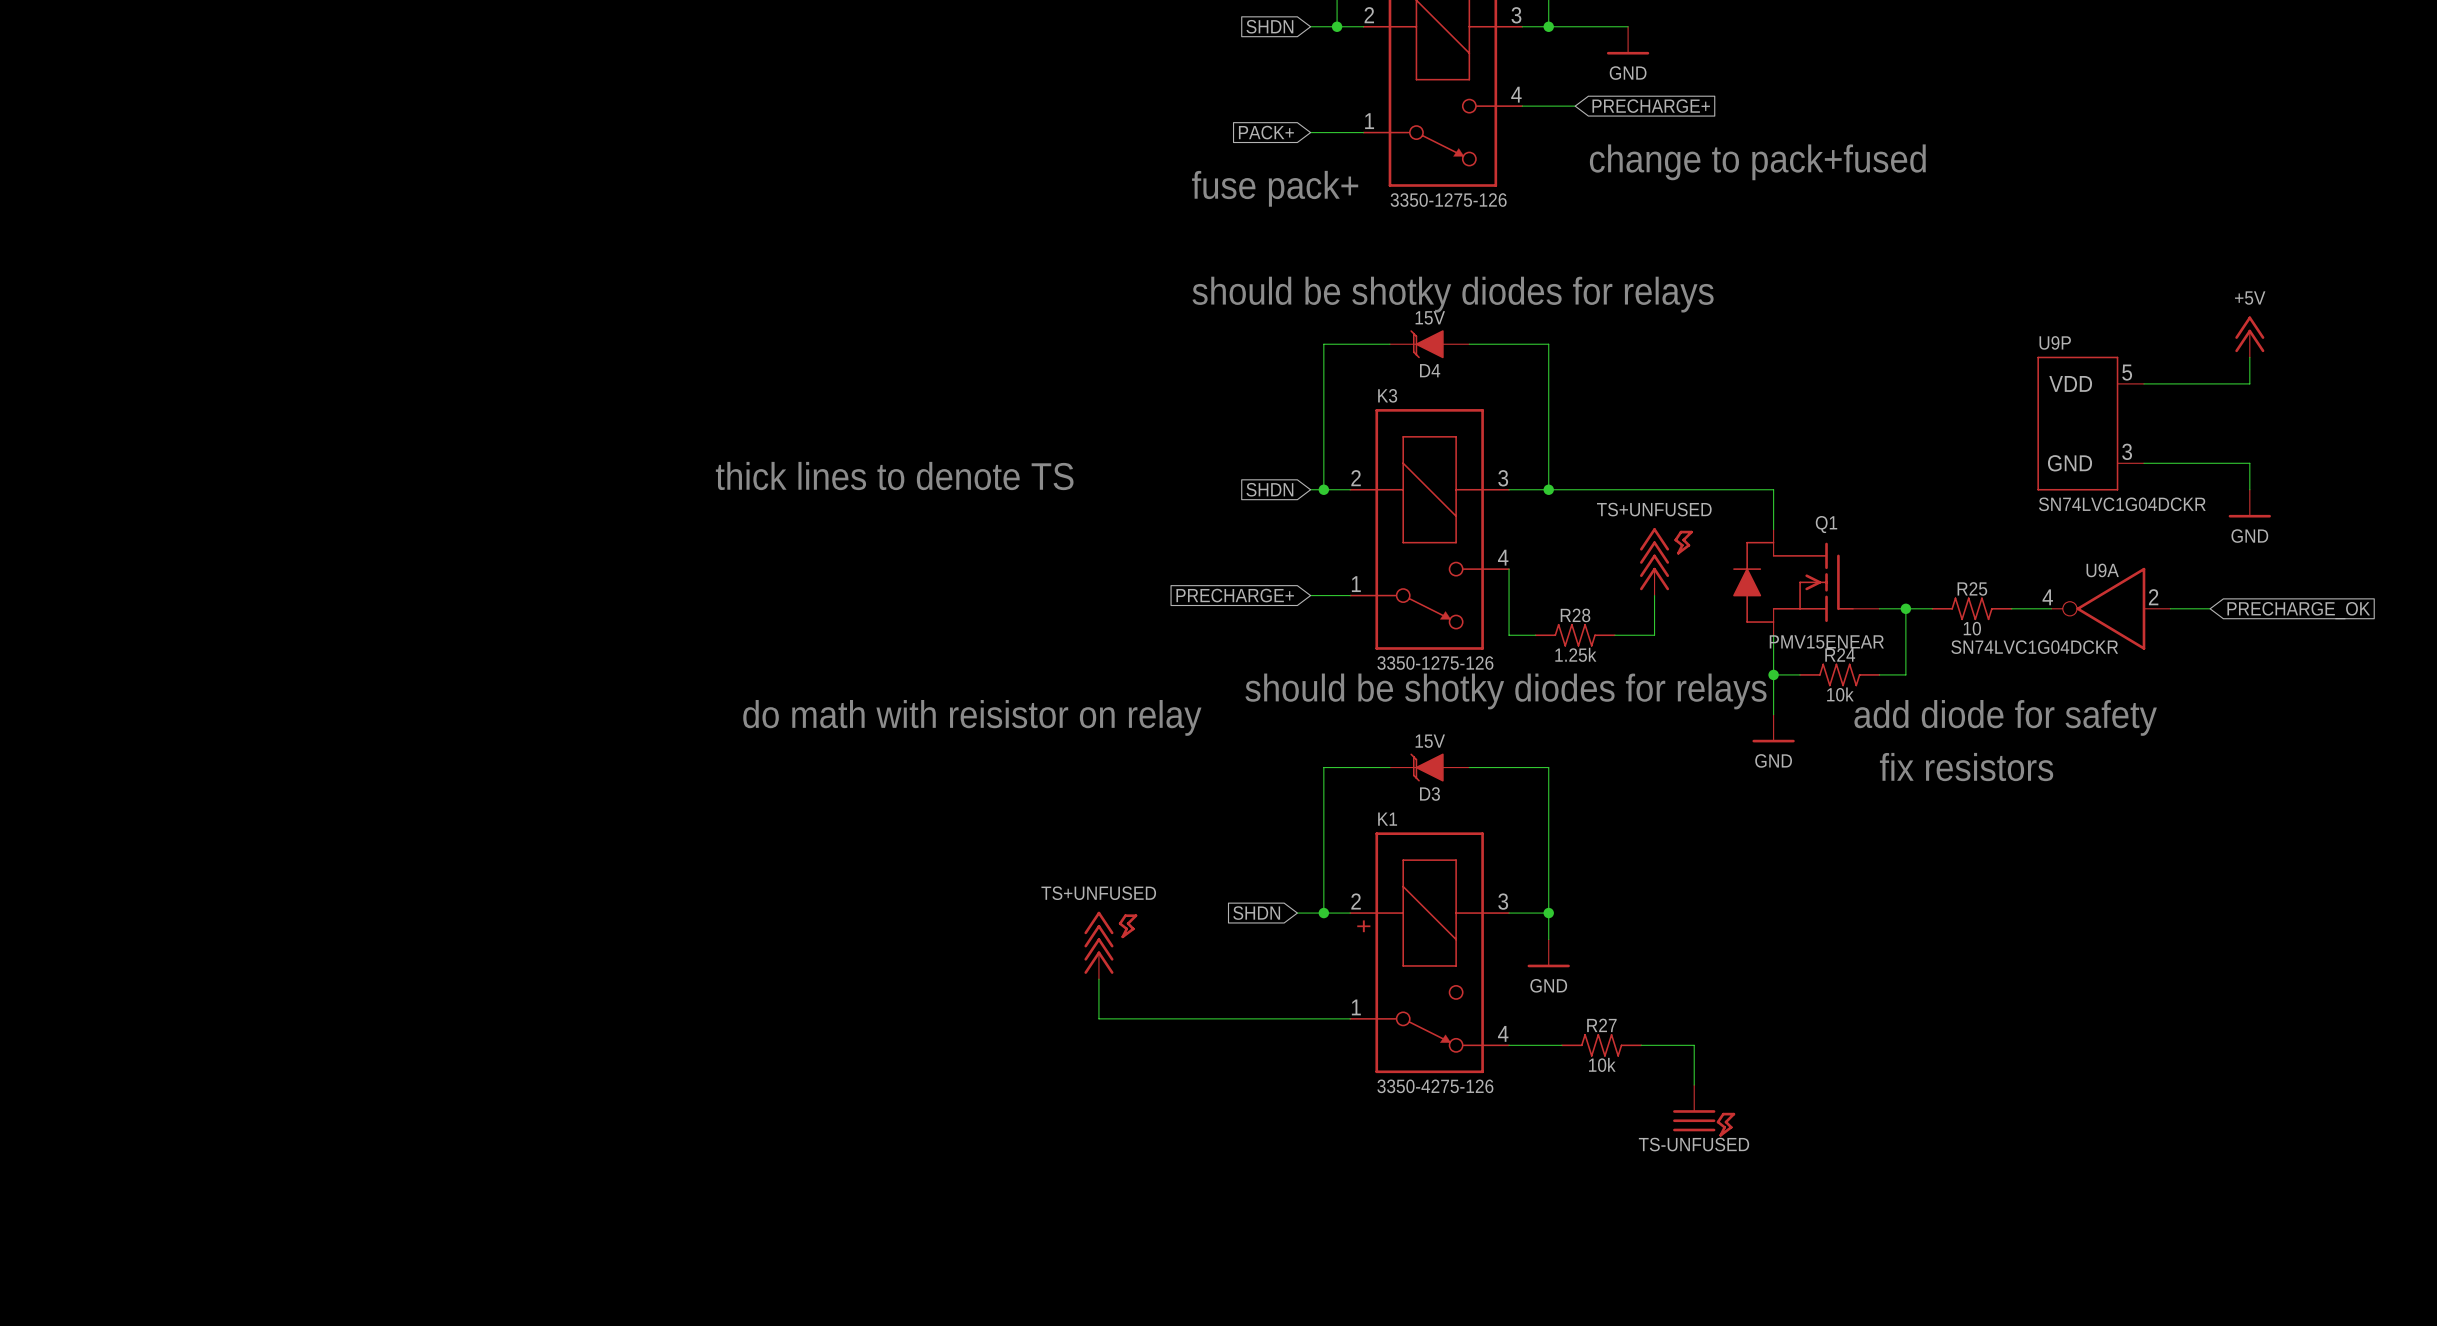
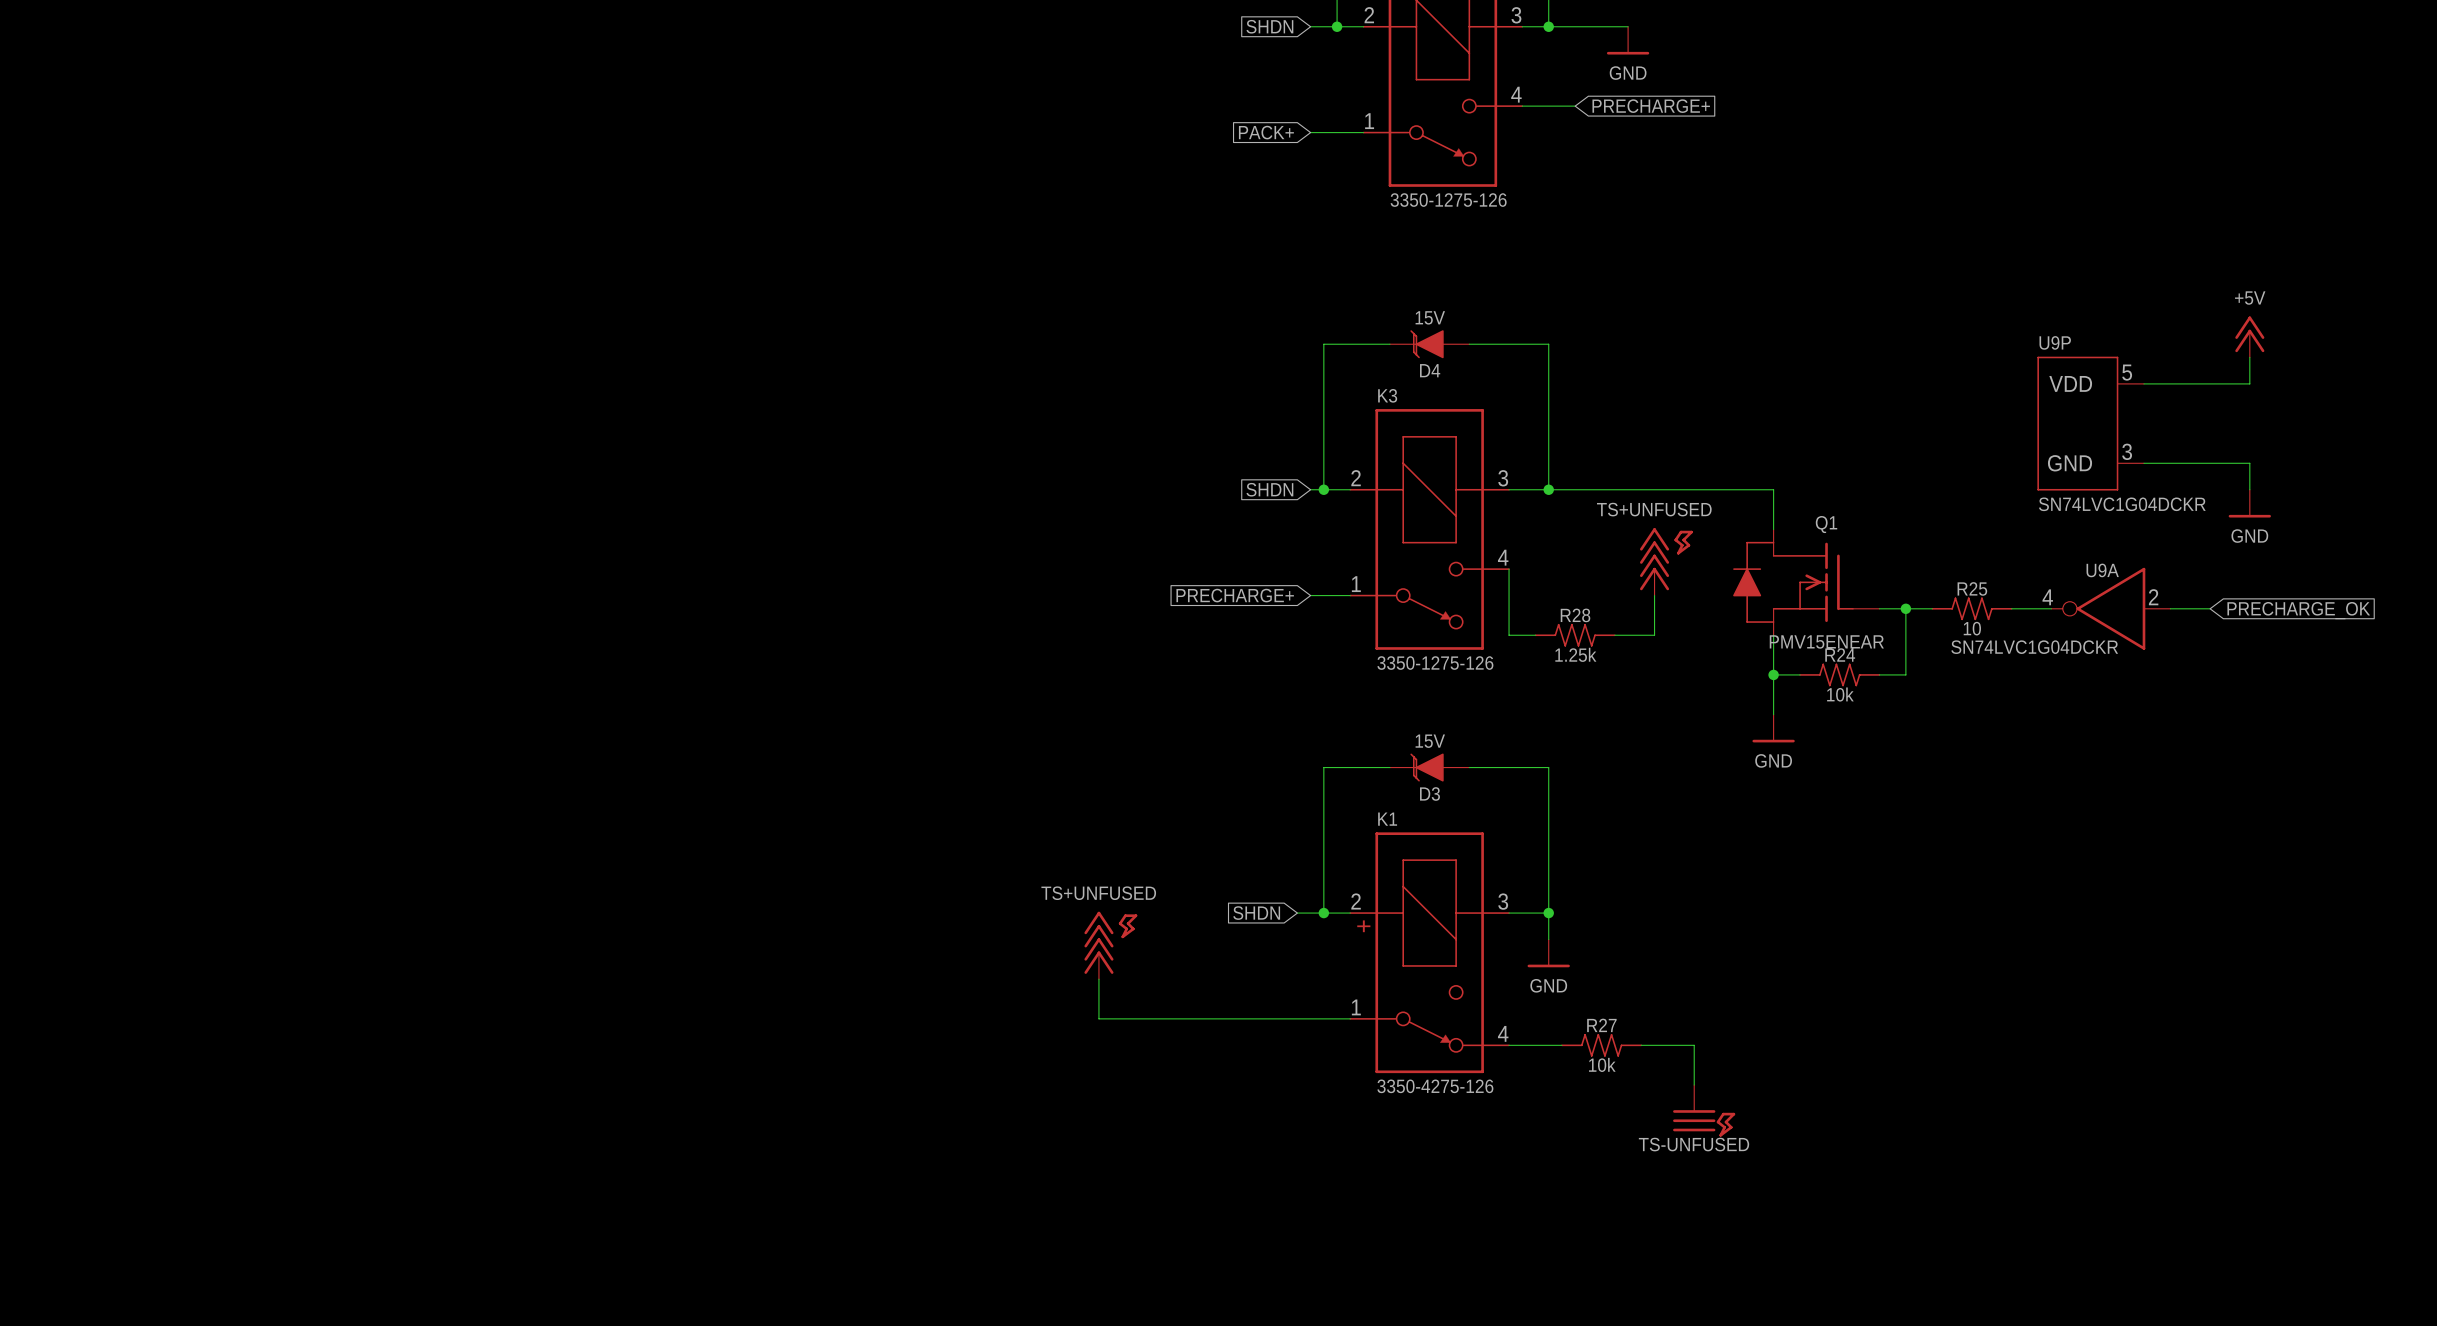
text: change to pack+fused (1757, 162) -> none
text: fuse pack+ (1275, 188) -> none
text: should be shotky diodes for relays (1453, 294) -> none
text: thick lines to denote TS (894, 476) -> none
text: should be shotky diodes for relays (1505, 691) -> none
text: do math with reisistor on relay (972, 717) -> none
text: add diode for safety (2005, 717) -> none
text: fix resistors (1966, 767) -> none

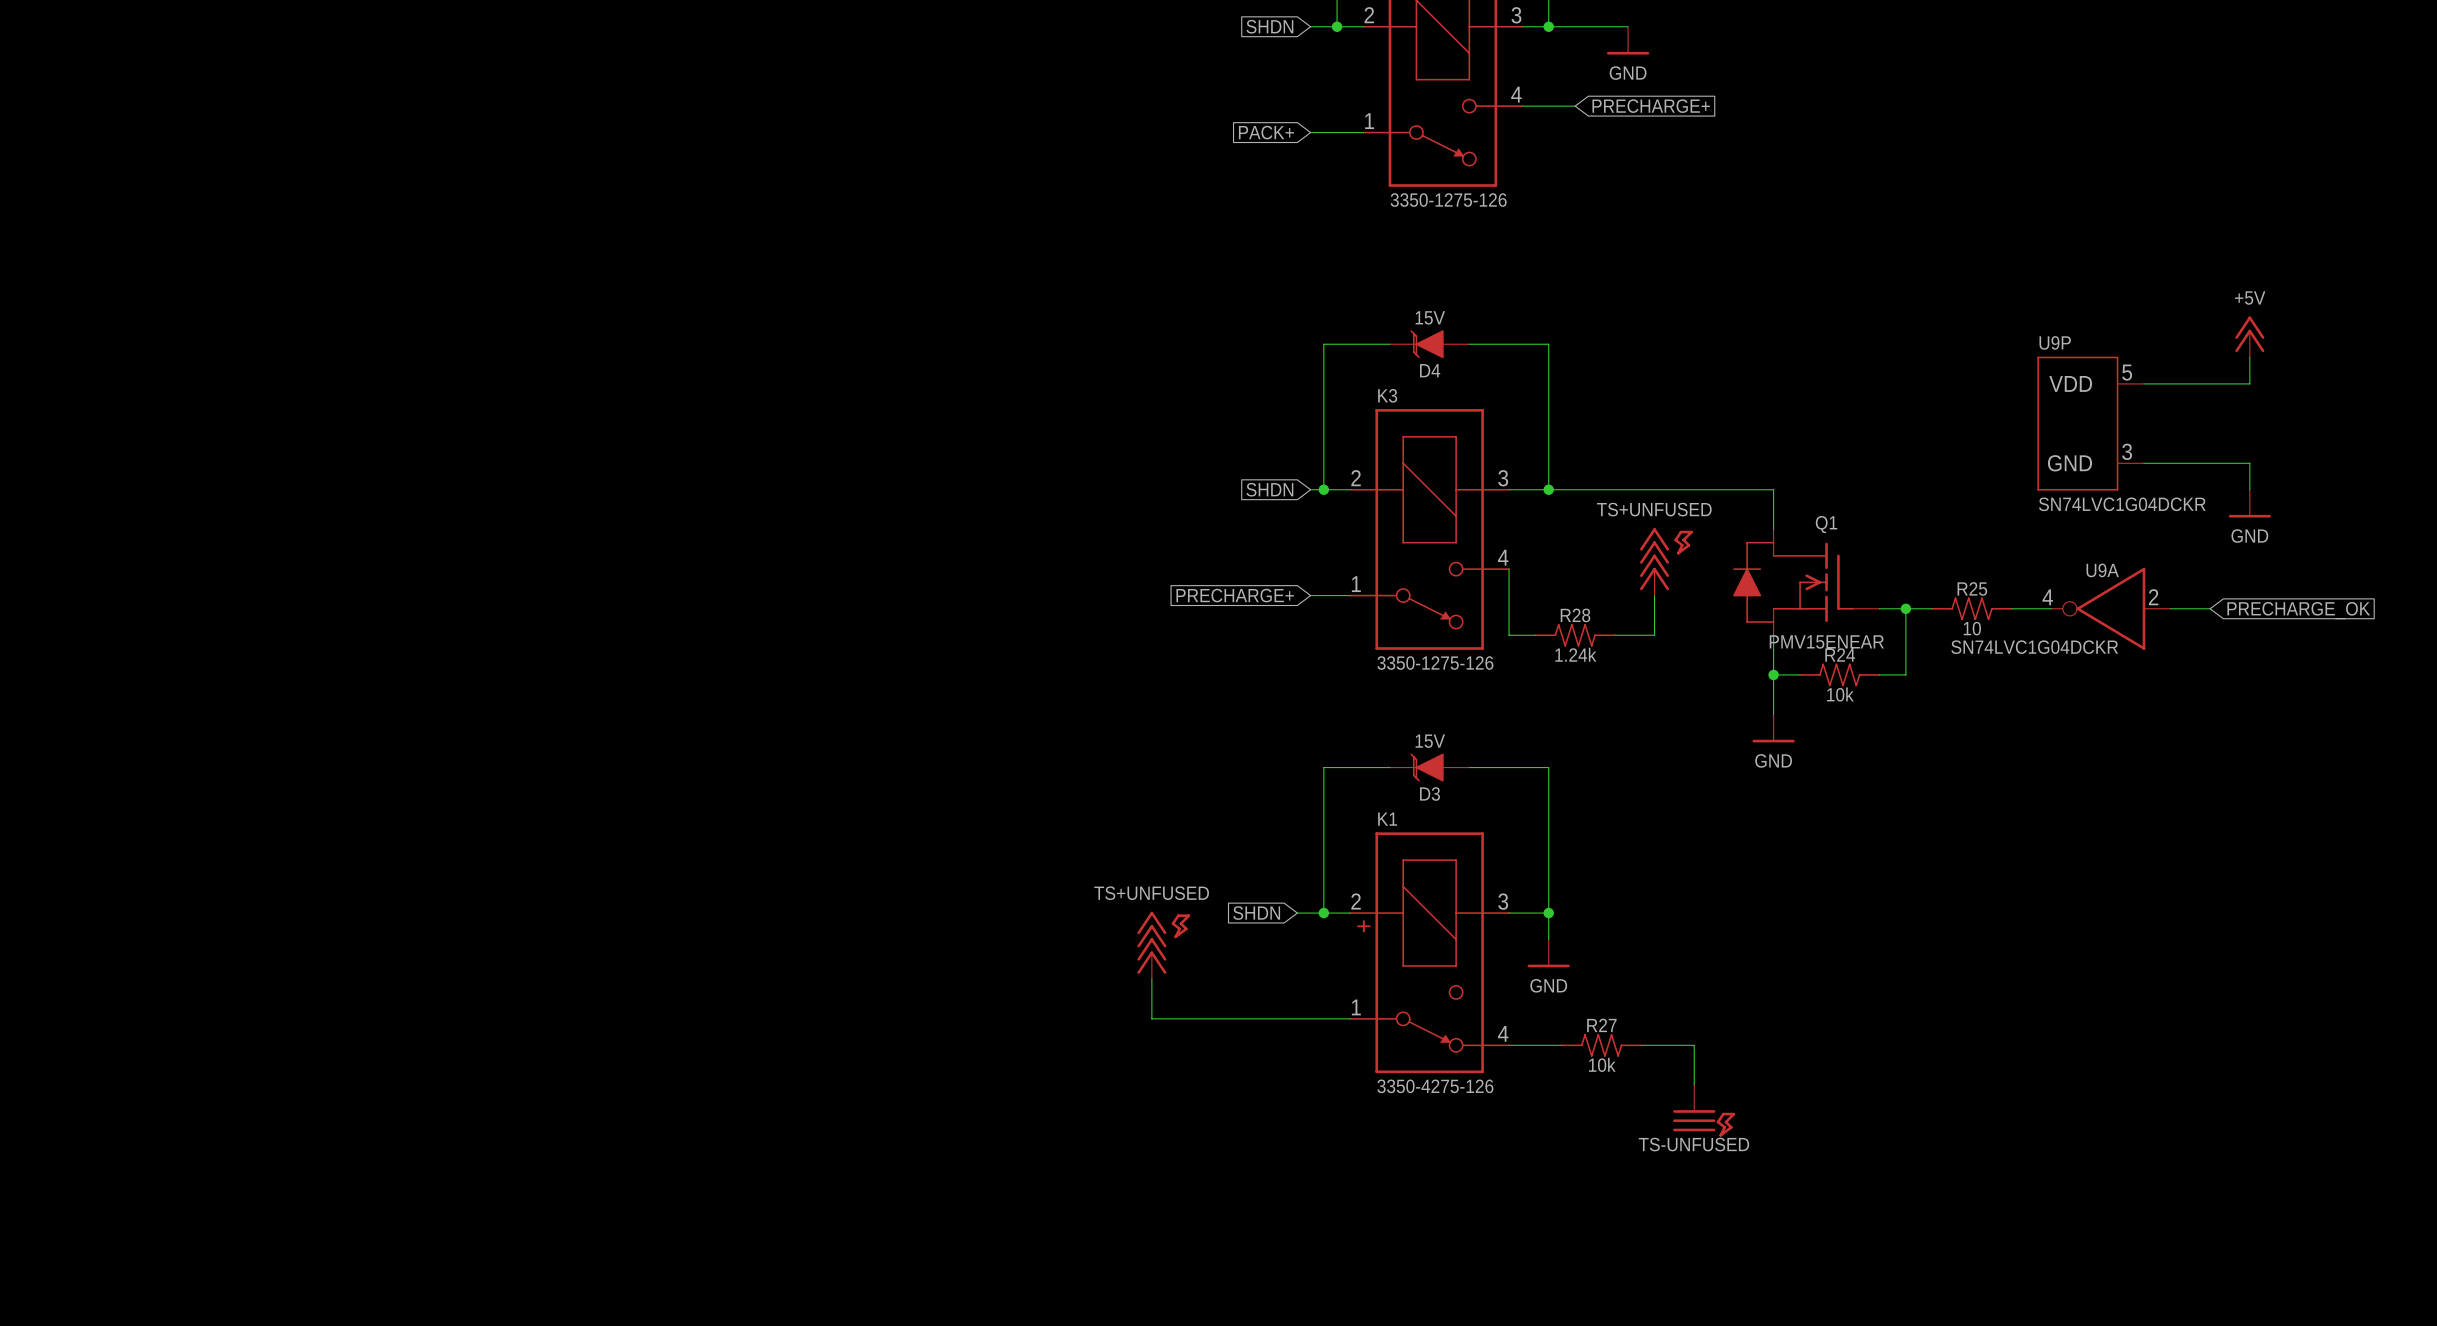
R28 text: 1.25k (1575, 654) -> 1.24k (1575, 654)
power symbol position: TS+UNFUSED (1110, 945) -> TS+UNFUSED (1163, 945)
wire: (1098, 979) (1098, 1018) (1151, 1018) -> (1151, 979) (1151, 1018)

